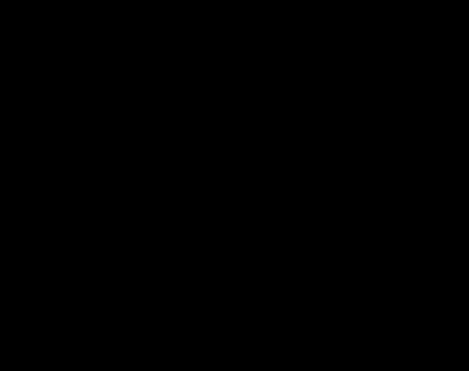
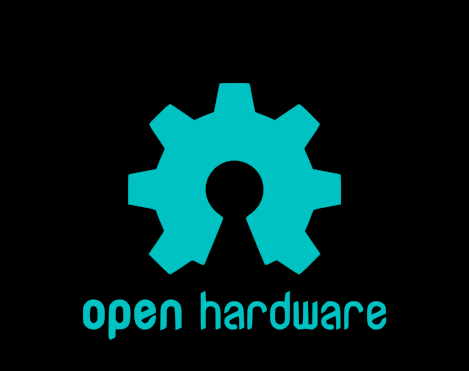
drawing: none -> [82, 82, 387, 340]

